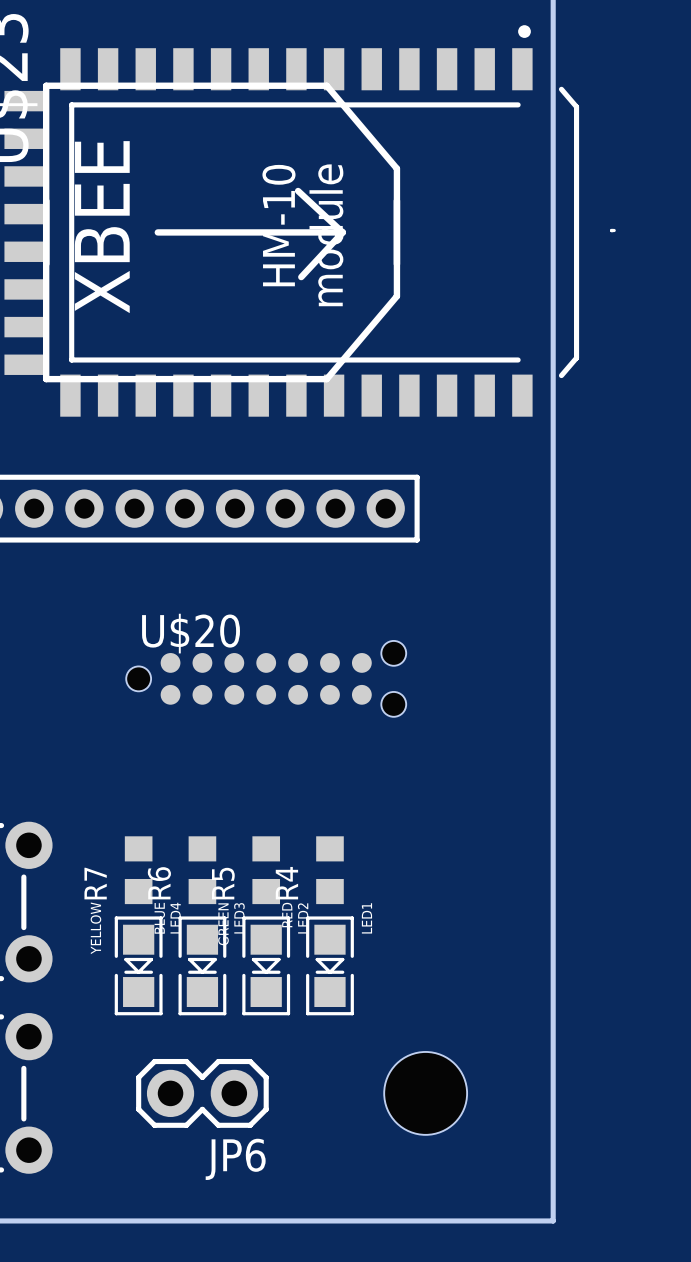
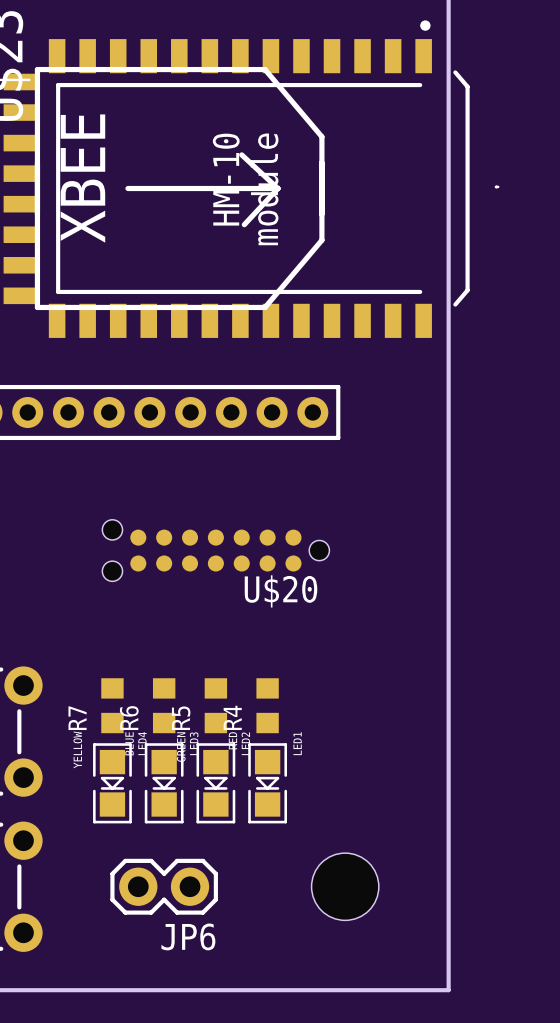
U$20 rotation: 0° (266, 678) -> 180° (215, 550)

